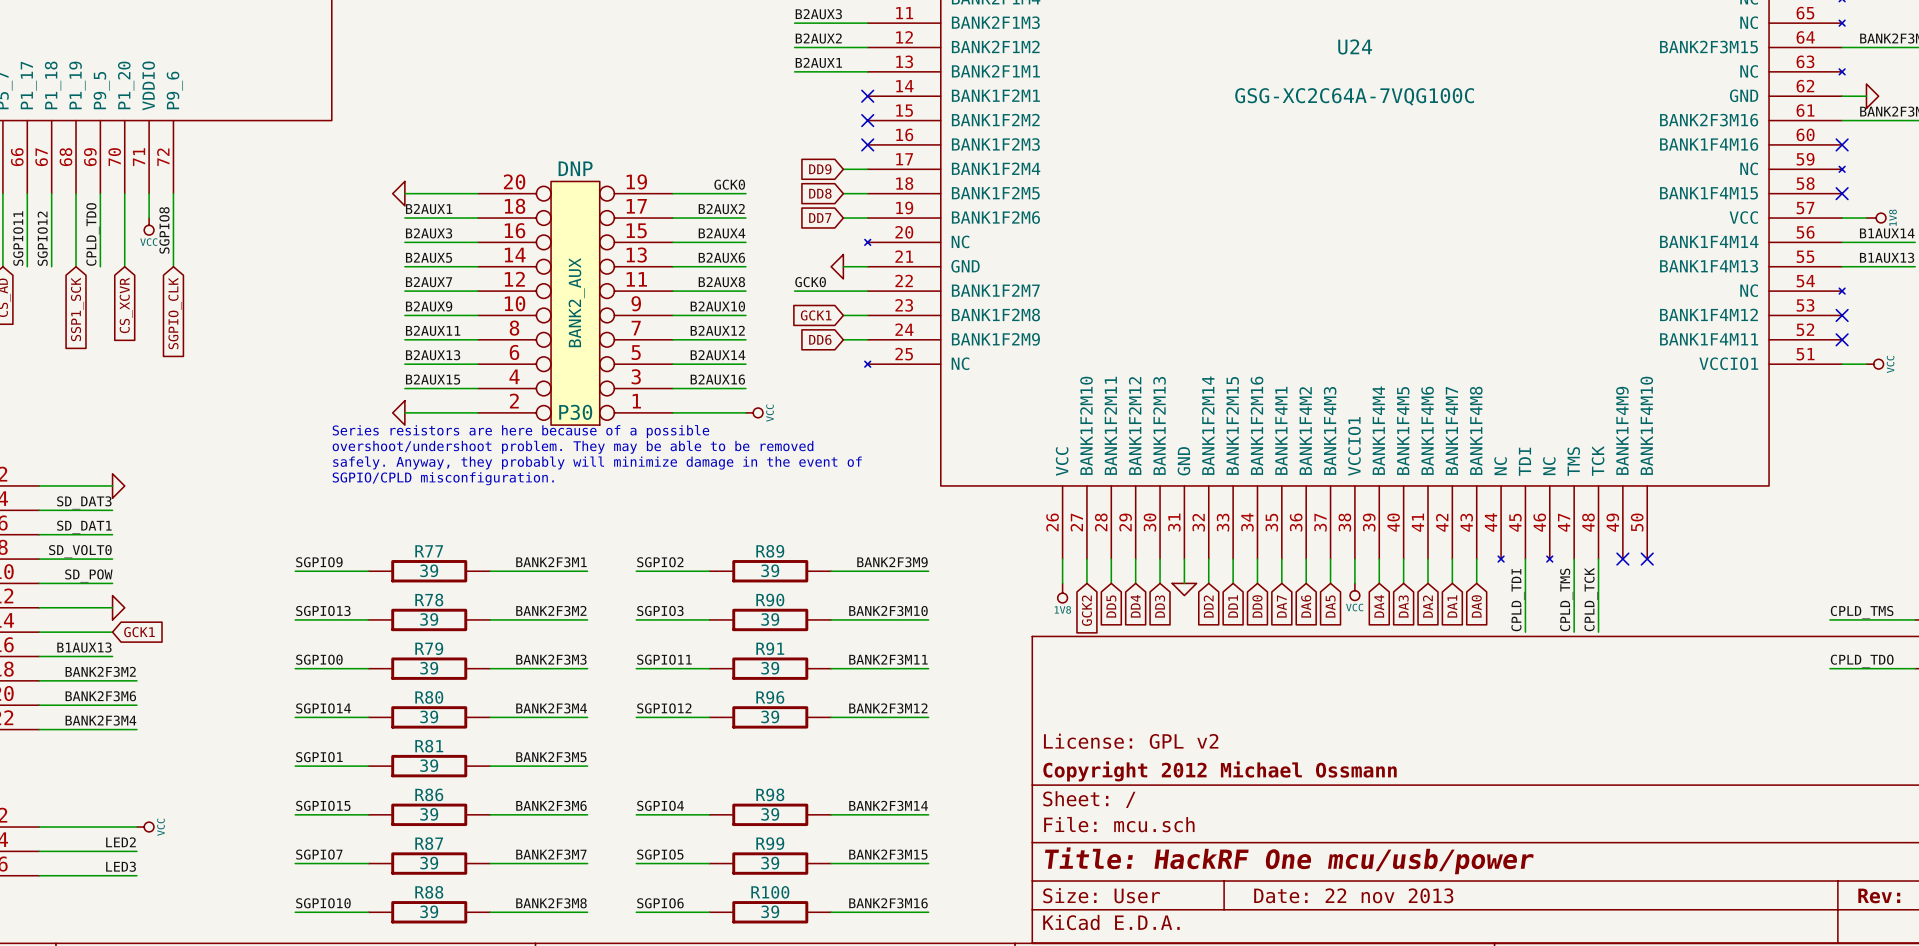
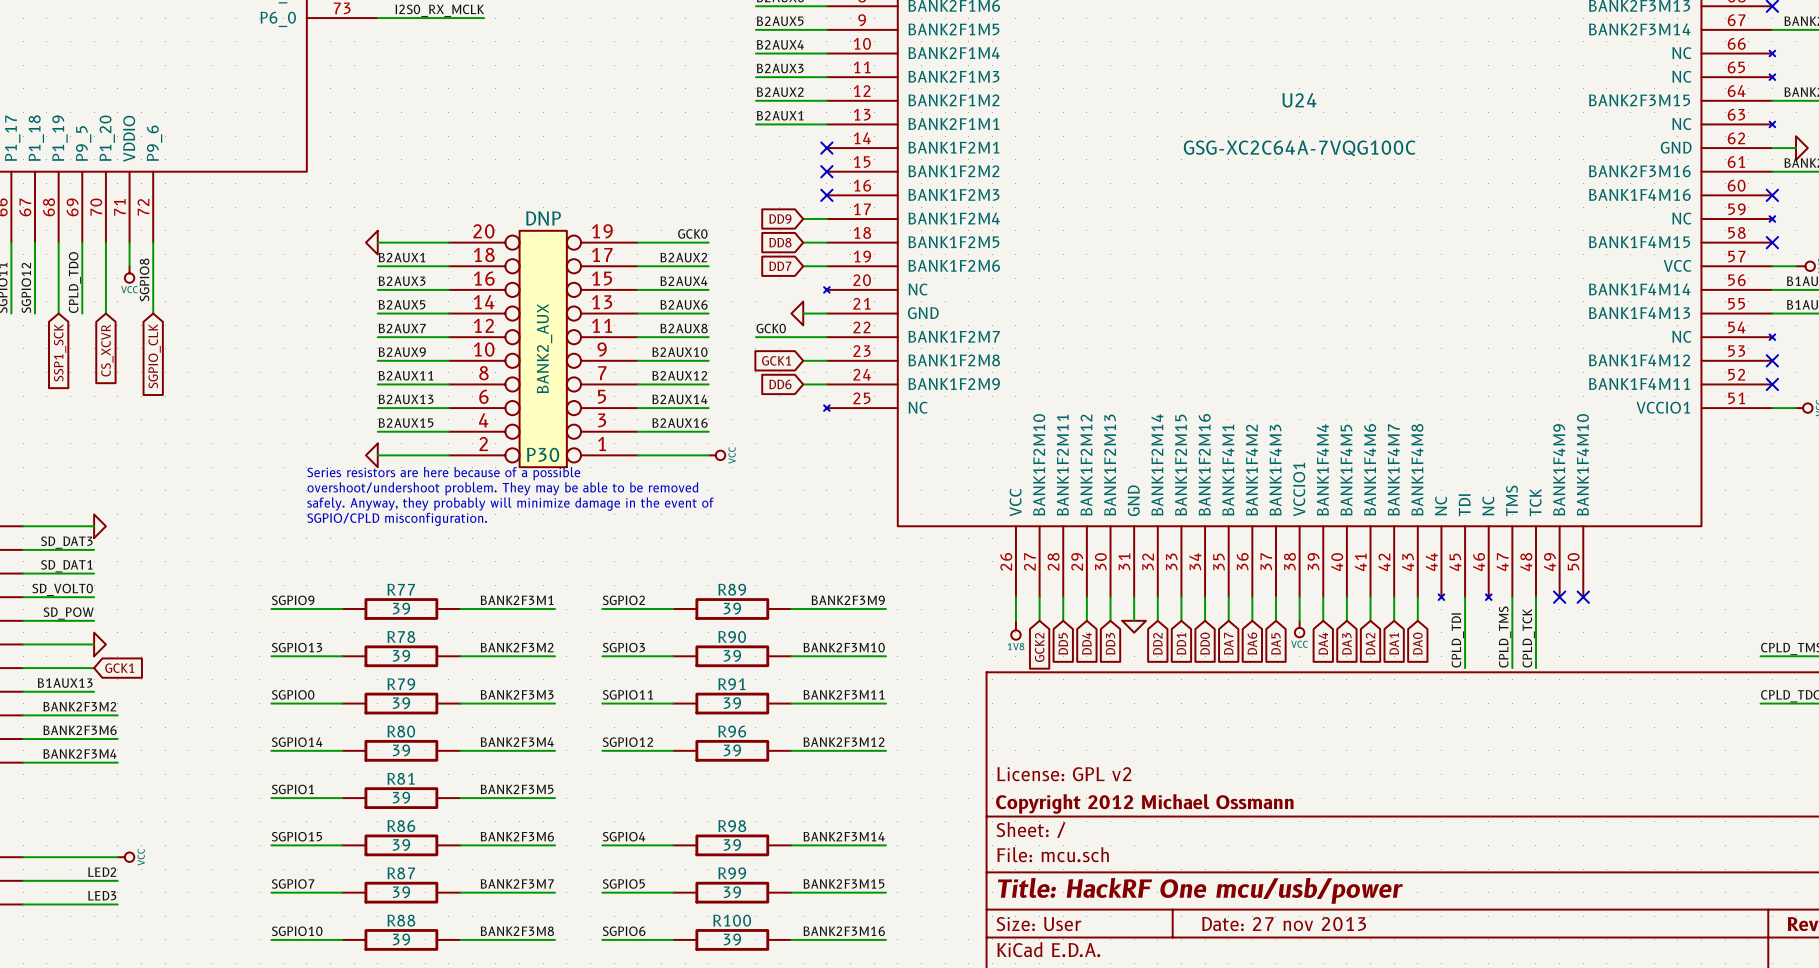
title block: Date: 22 nov 2013 (1353, 895) -> Date: 27 nov 2013 (1284, 924)

